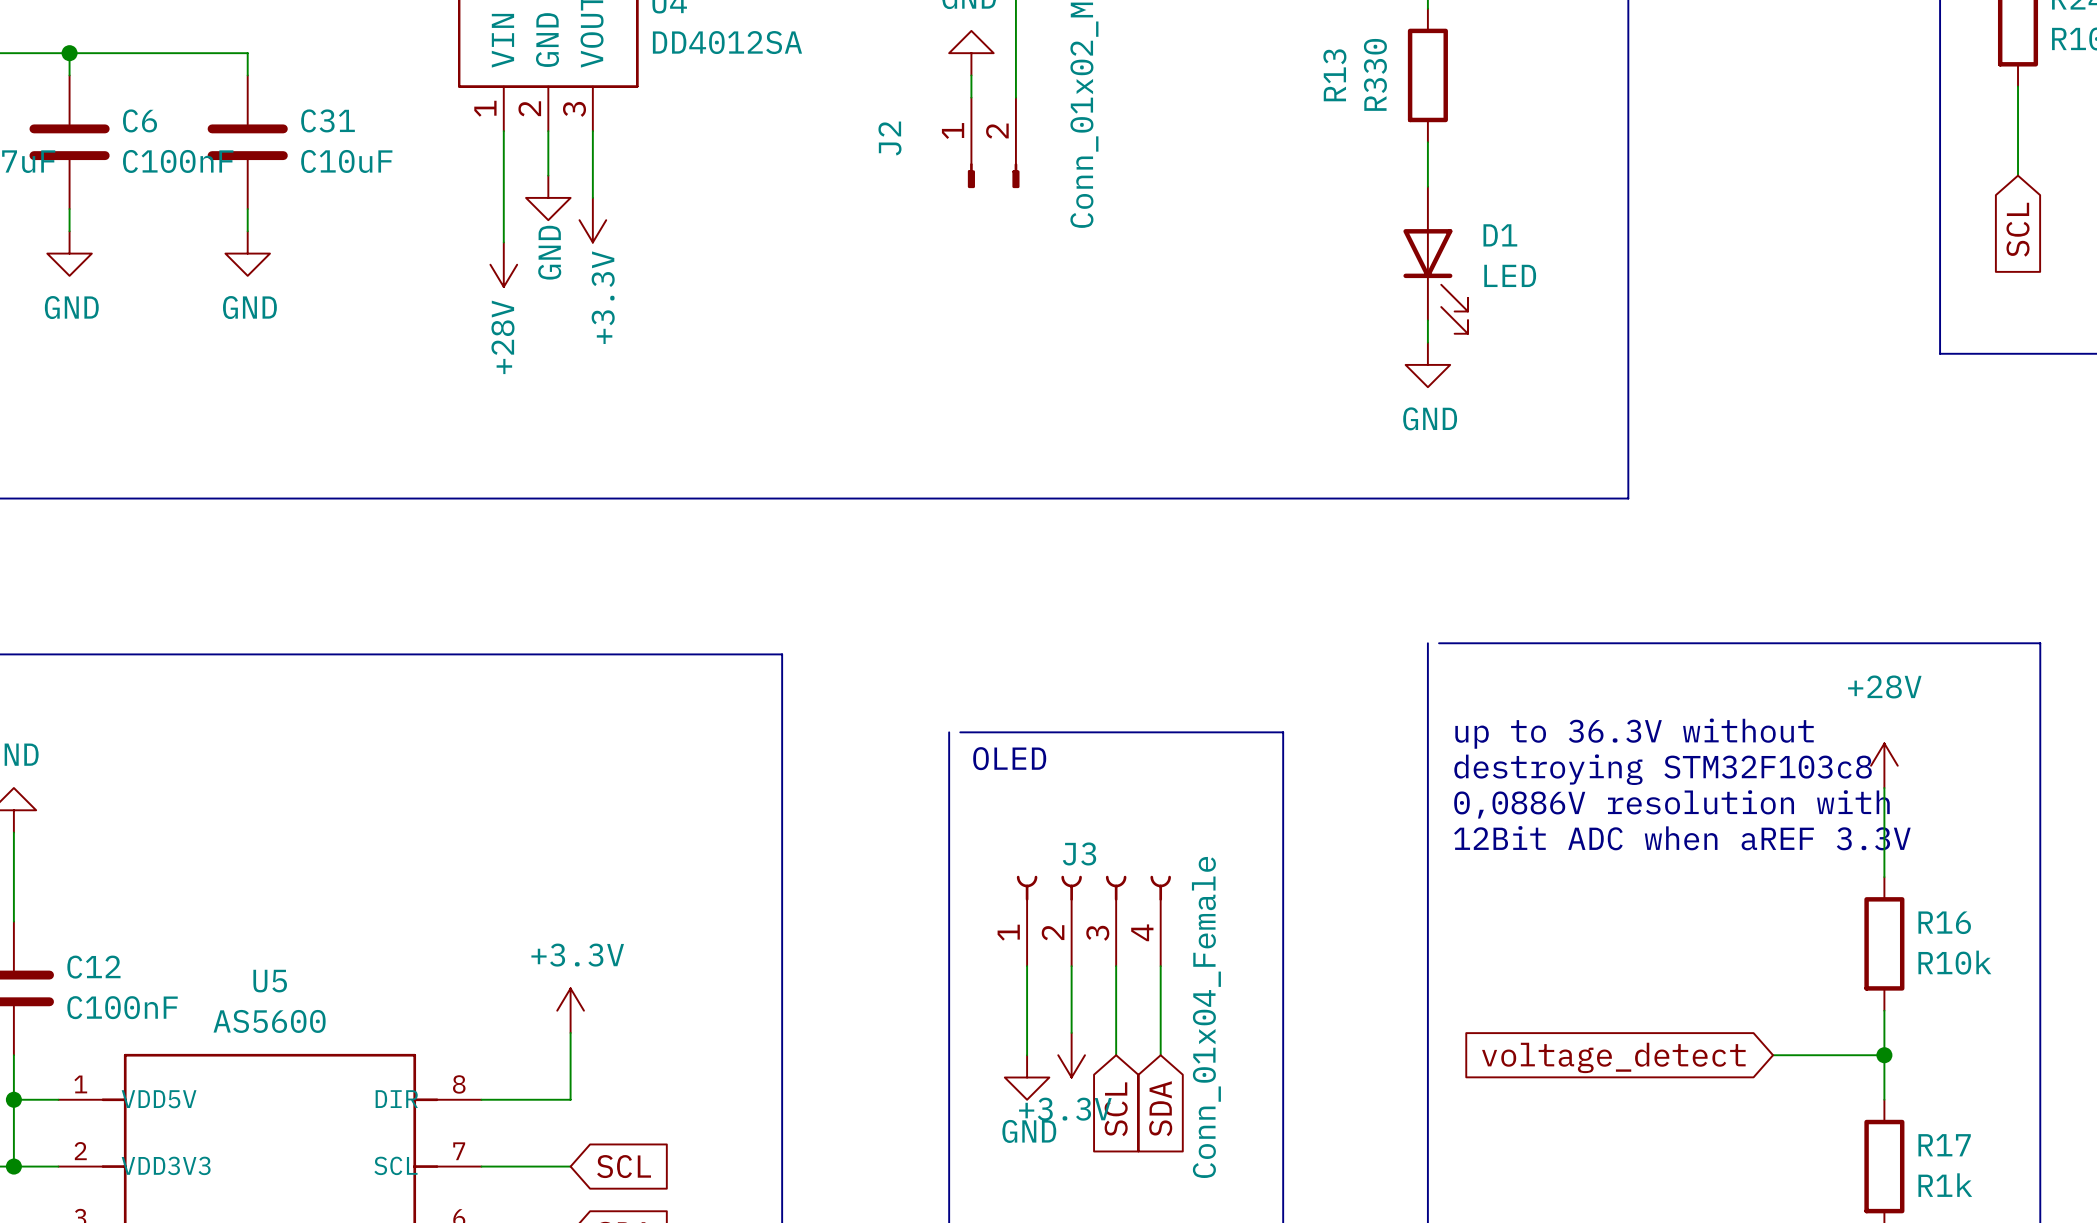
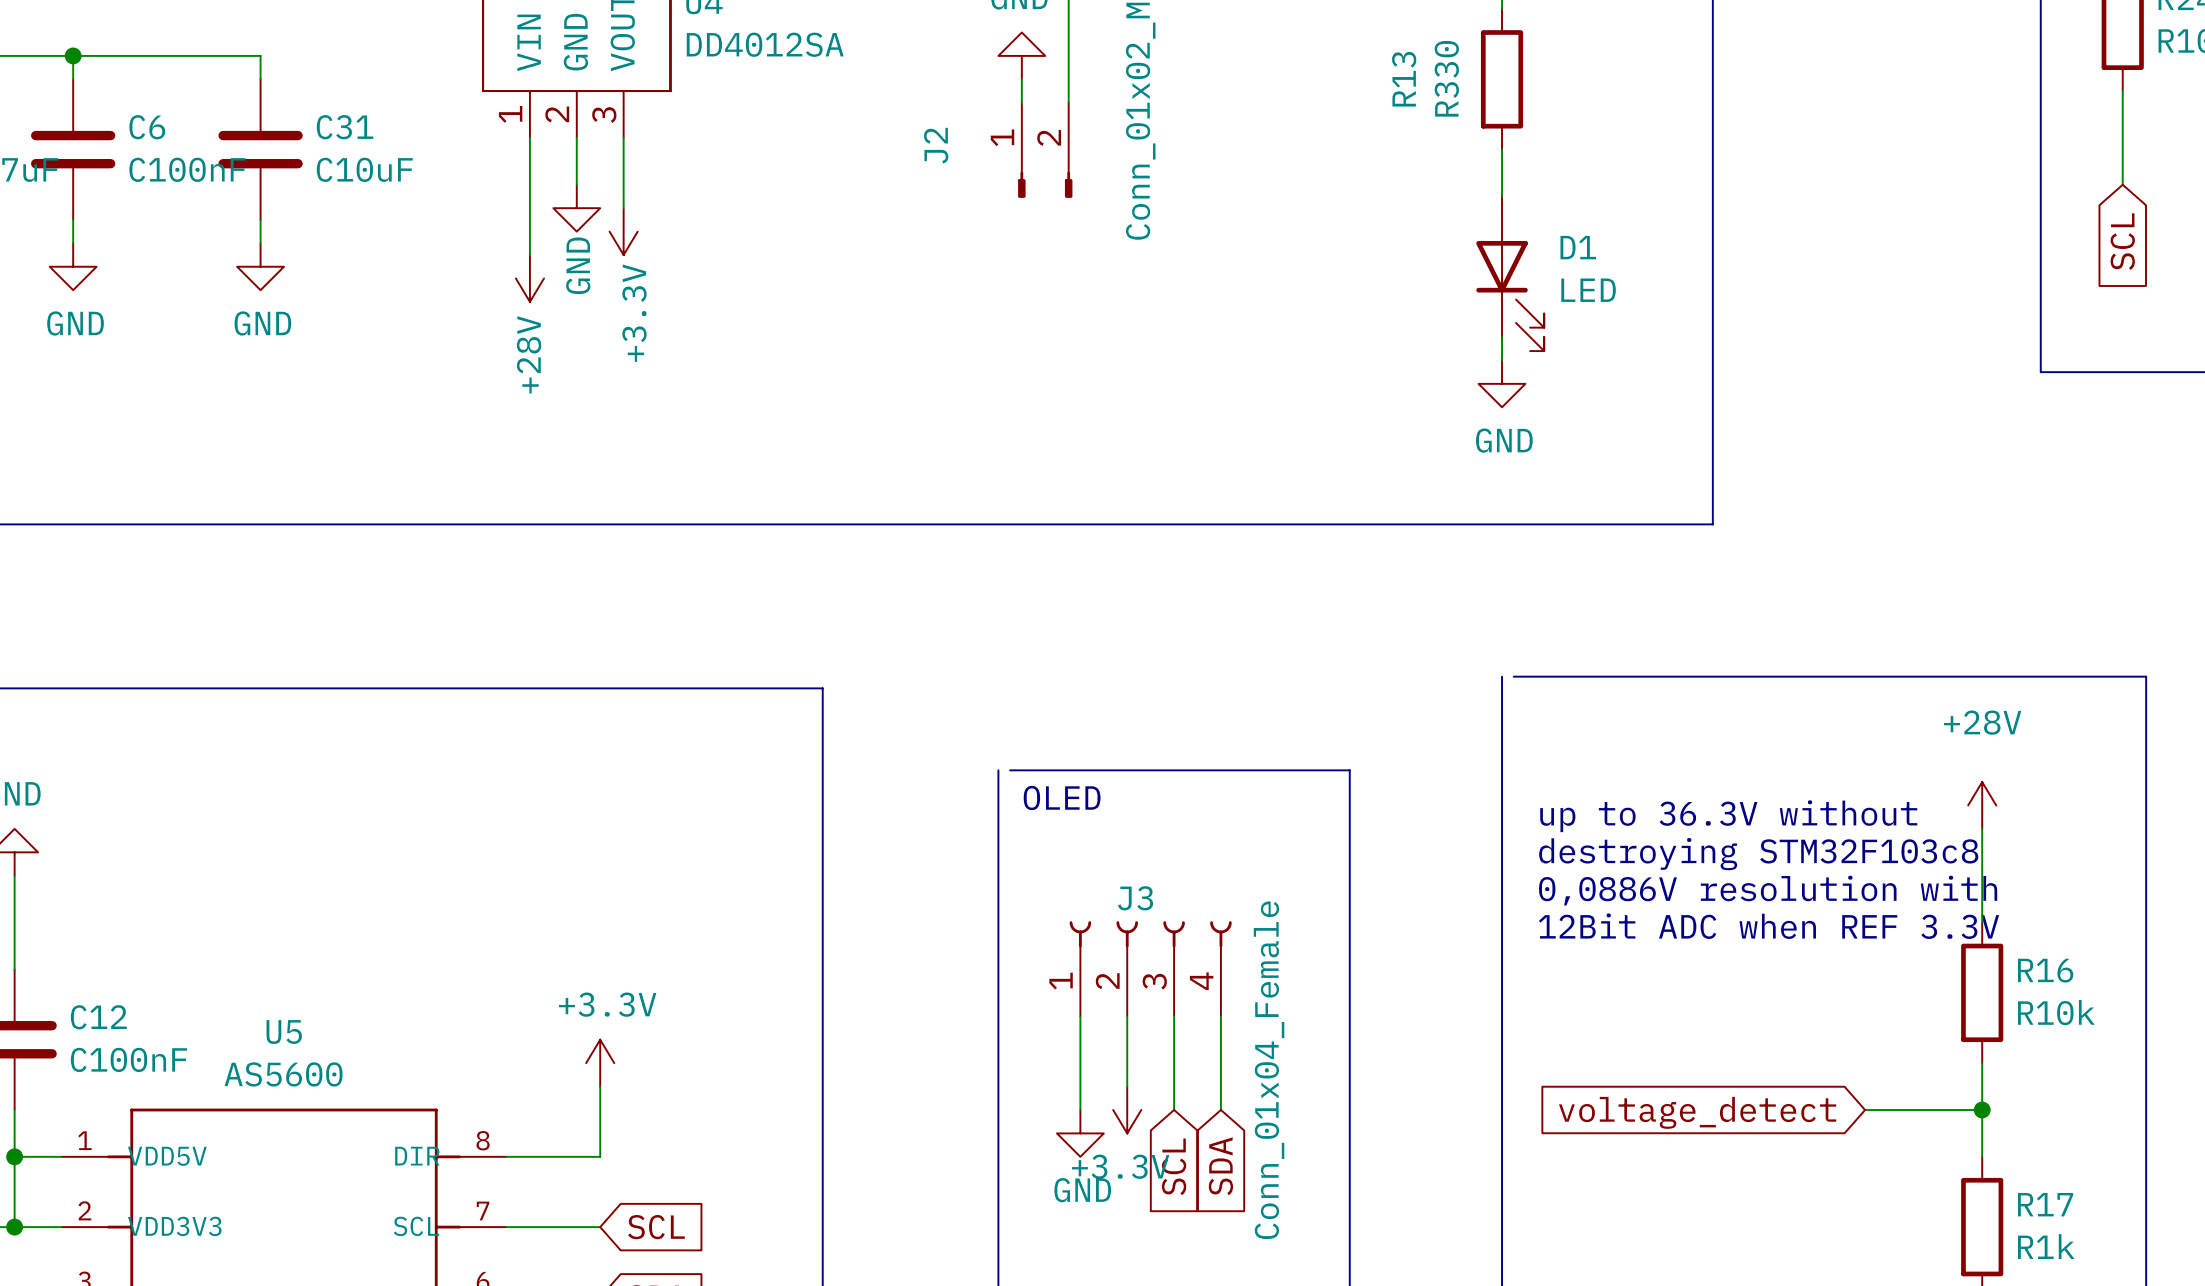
text: up to 36.3V without (1634, 733) -> none
text: destroying STM32F103c8 (1663, 769) -> up to 36.3V without (1728, 816)
text: 0,0886V resolution with (1671, 804) -> destroying STM32F103c8 (1758, 854)
text: 12Bit ADC when aREF 3.3V (1682, 838) -> 0,0886V resolution with (1768, 890)
text: none -> 12Bit ADC when REF 3.3V (1769, 926)

